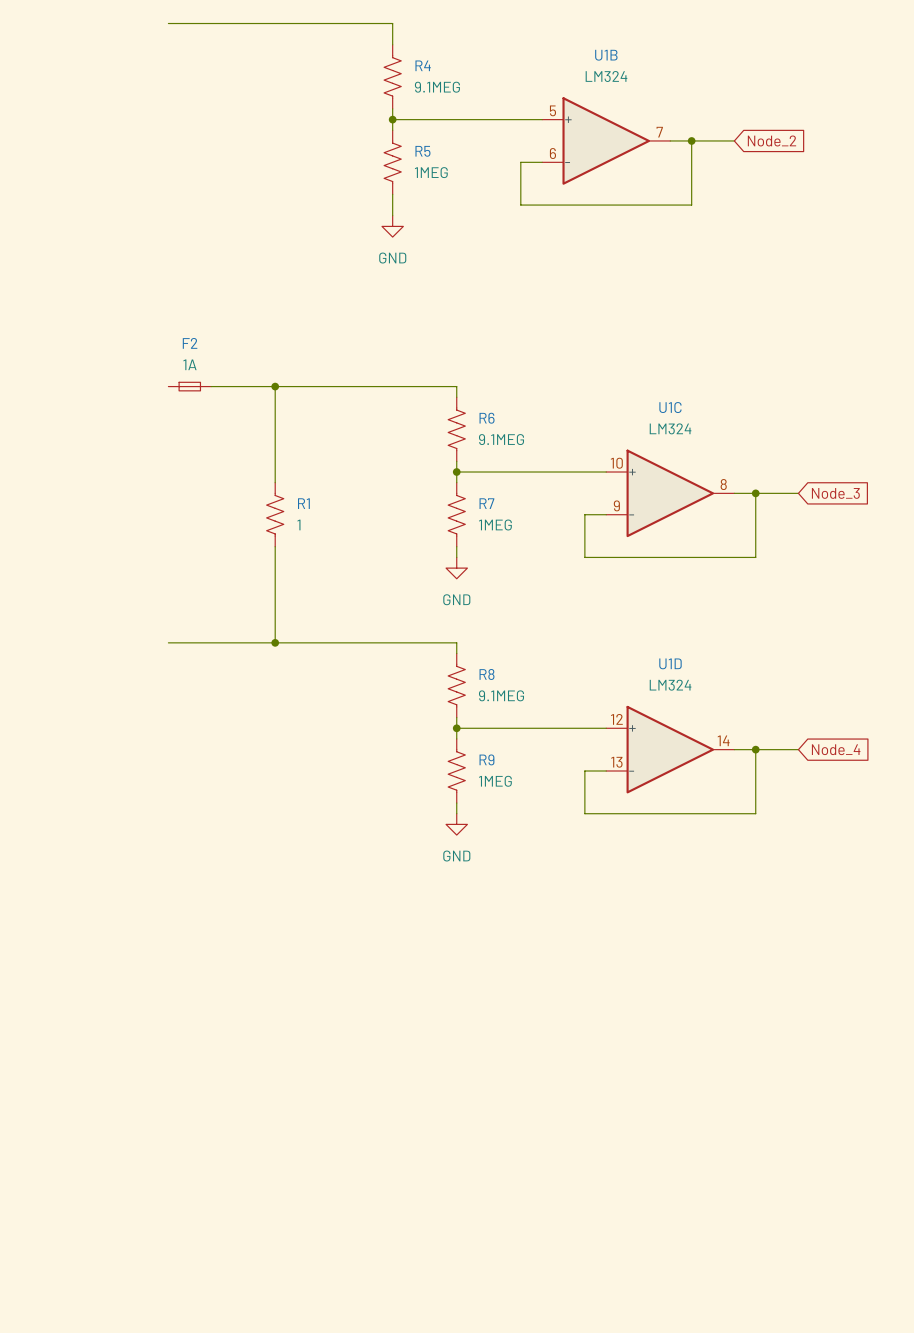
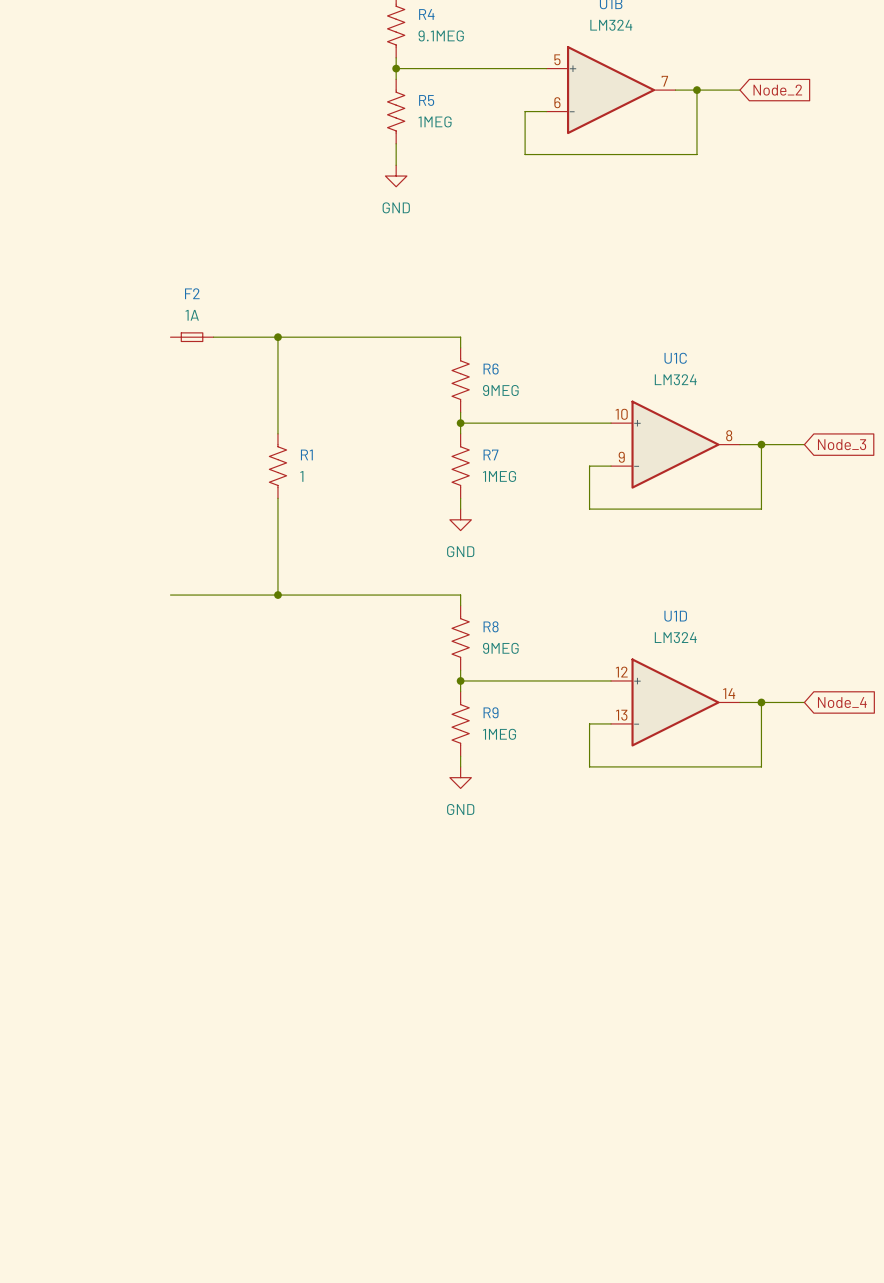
R6 value: 9.1MEG (501, 439) -> 9MEG (500, 390)
R8 value: 9.1MEG (501, 695) -> 9MEG (500, 648)

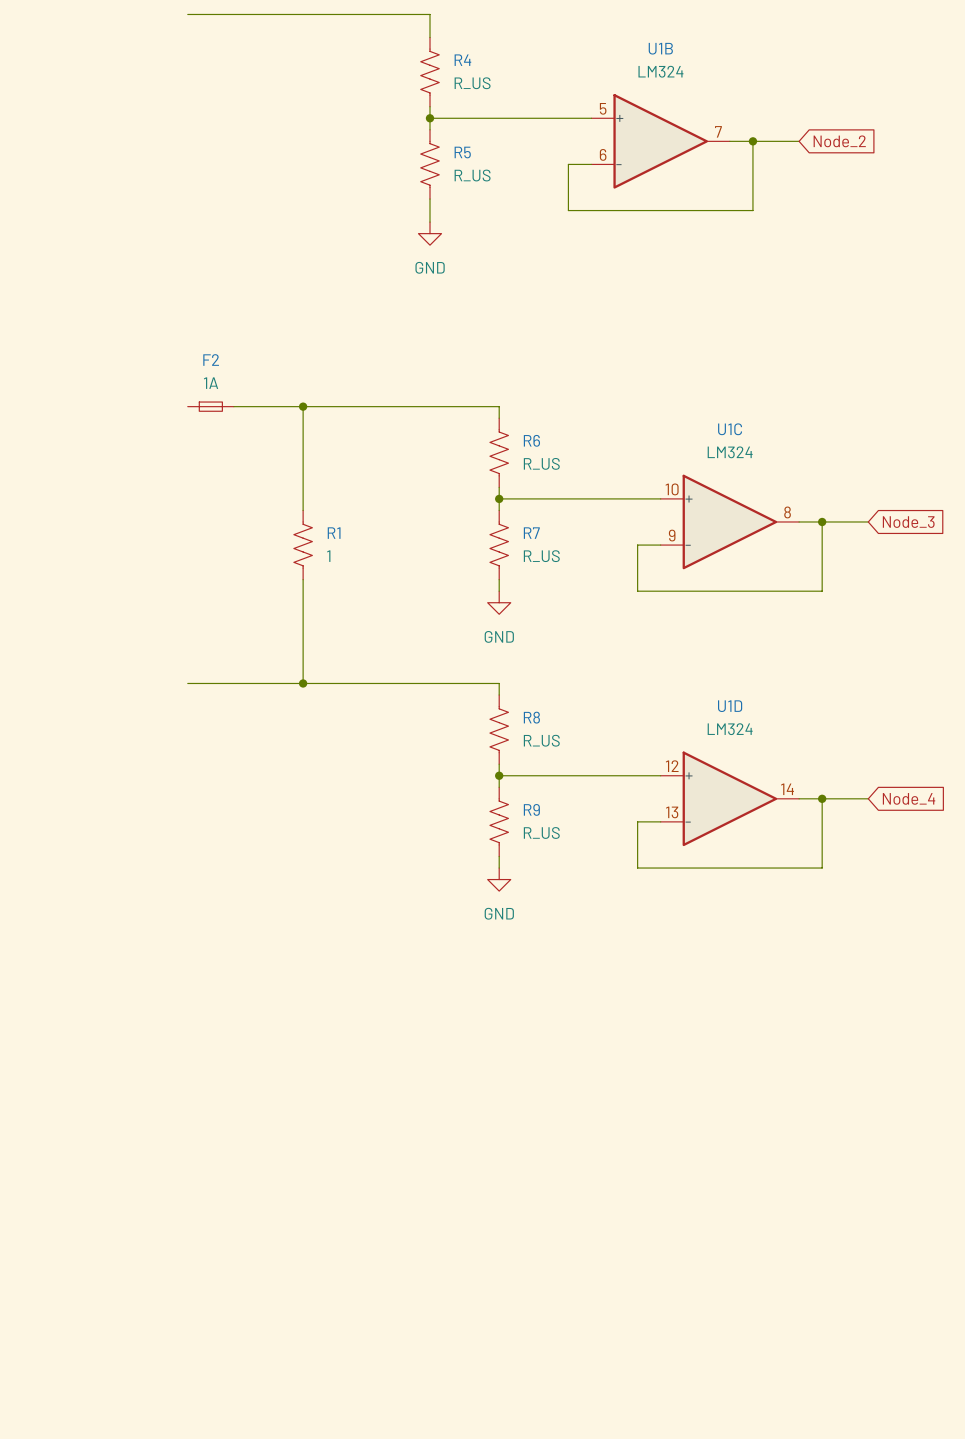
R4 value: 9.1MEG (441, 35) -> R_US (472, 83)
R5 value: 1MEG (435, 121) -> R_US (472, 175)
R6 value: 9MEG (500, 390) -> R_US (541, 463)
R7 value: 1MEG (499, 476) -> R_US (541, 556)
R8 value: 9MEG (500, 648) -> R_US (541, 740)
R9 value: 1MEG (499, 734) -> R_US (541, 832)

